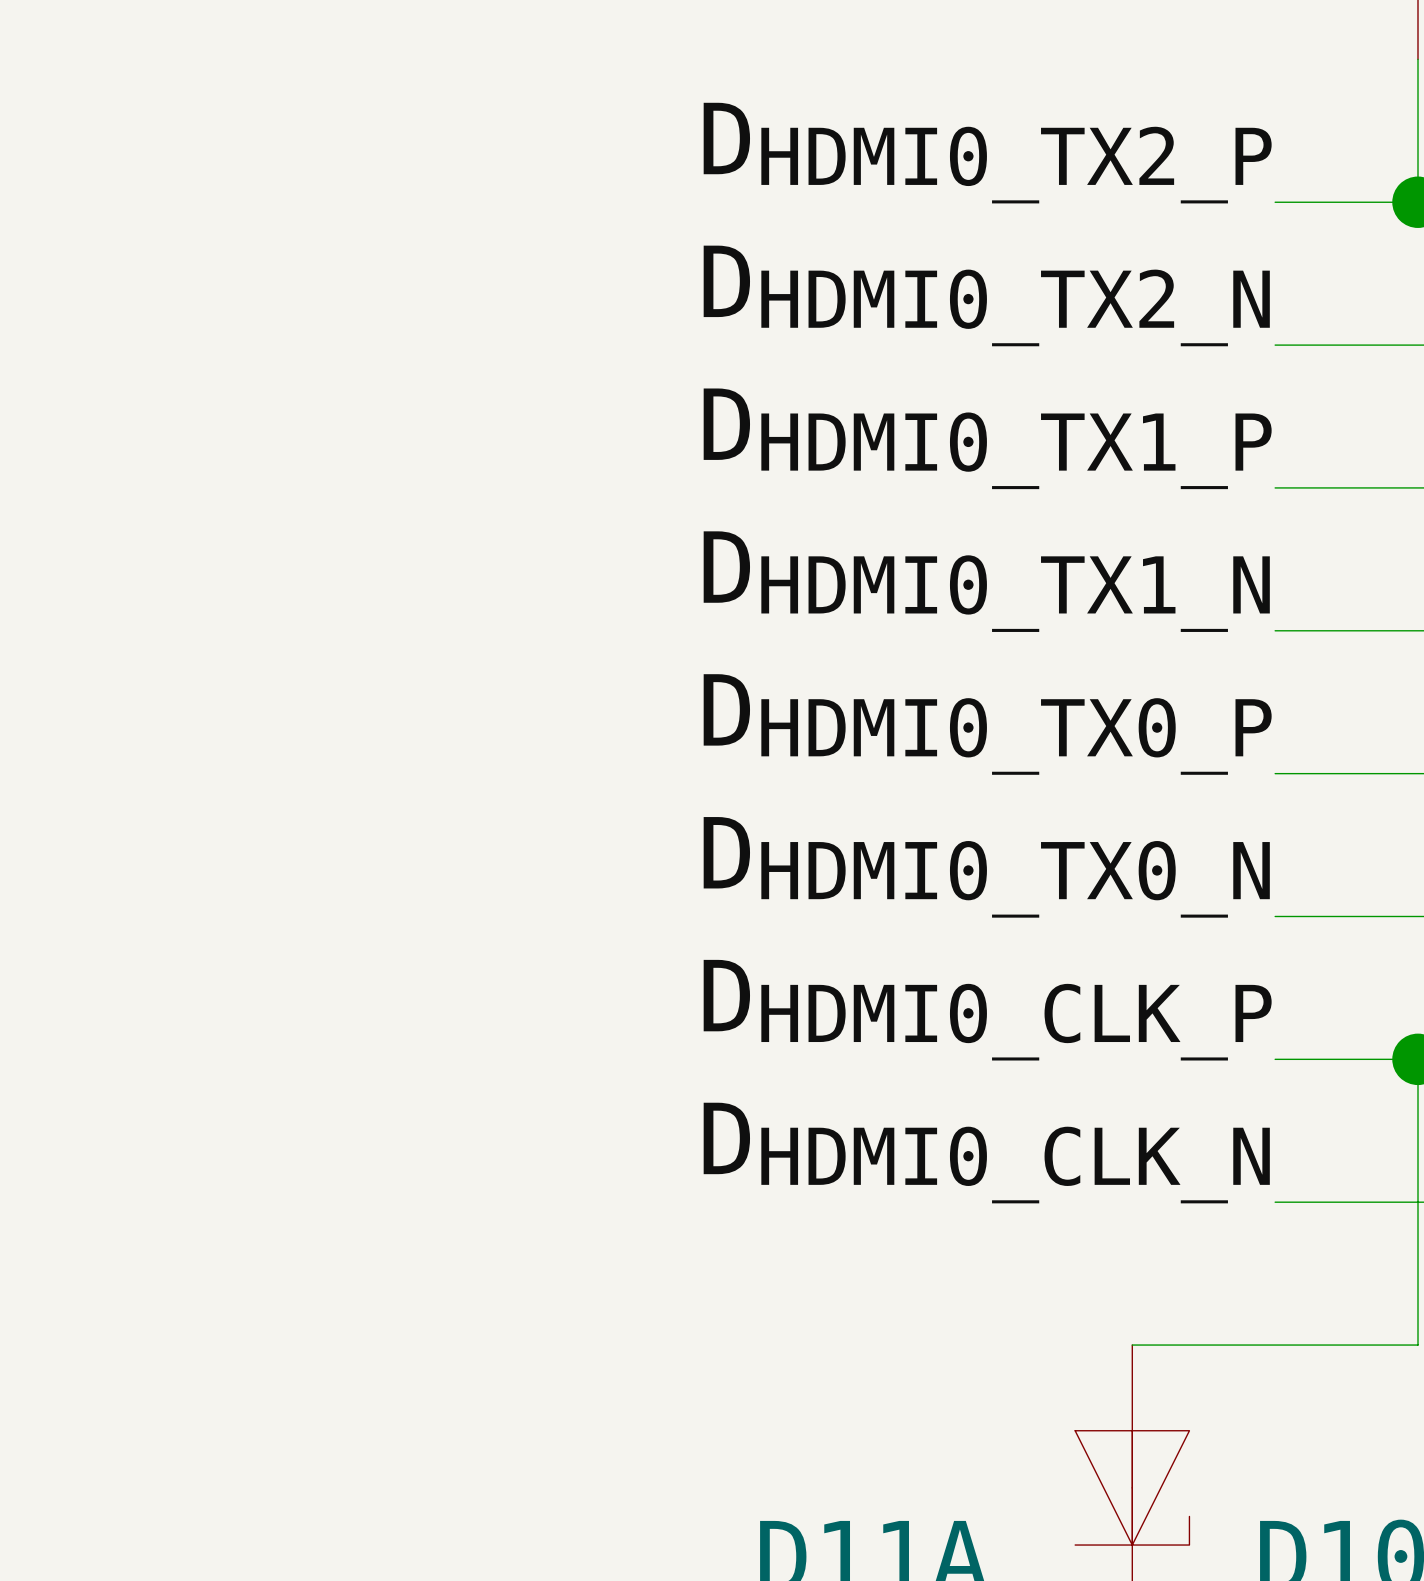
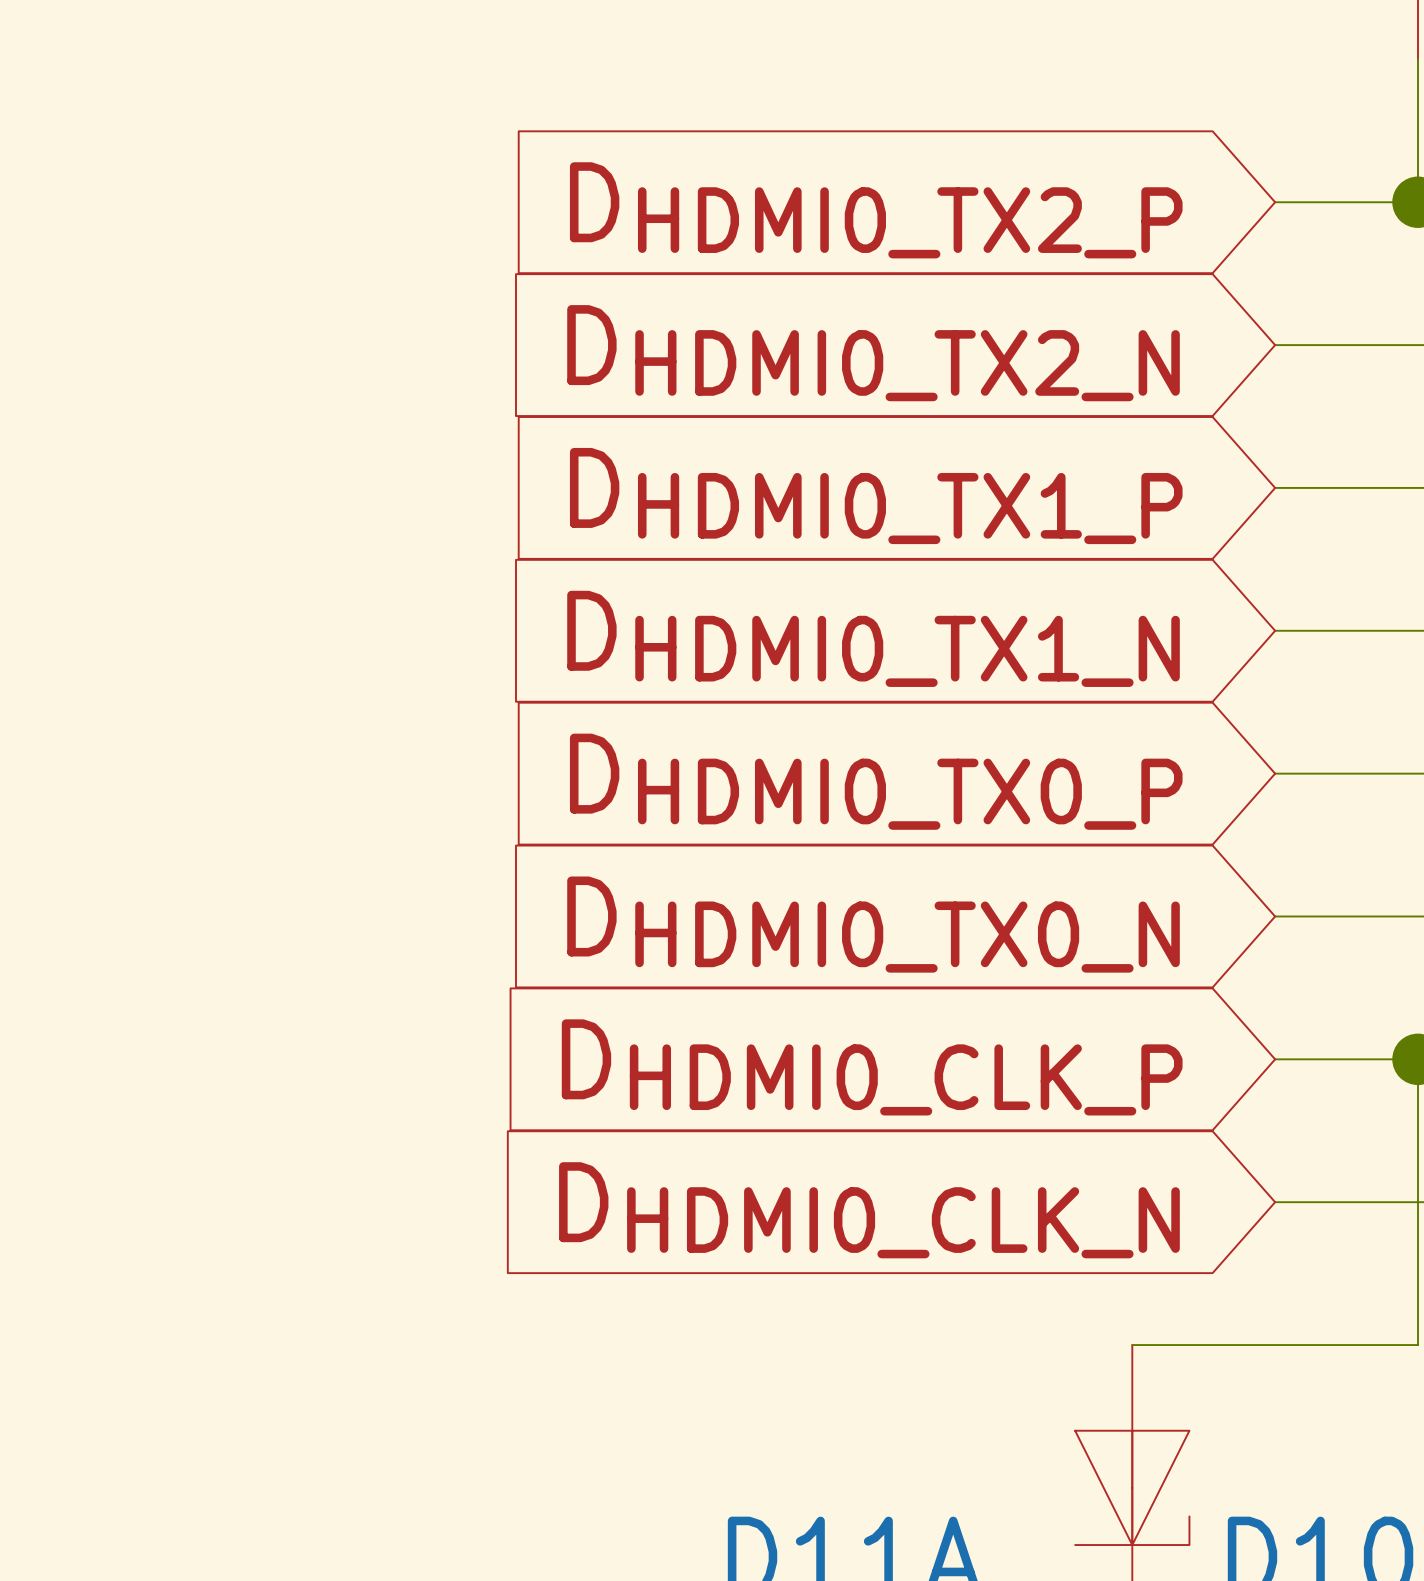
label: DHDMI0_TX2_P (987, 153) -> none
global label: none -> DHDMI0_TX2_P (876, 210)
label: DHDMI0_TX2_N (986, 295) -> none
global label: none -> DHDMI0_TX2_N (873, 353)
label: DHDMI0_TX1_P (987, 438) -> none
global label: none -> DHDMI0_TX1_P (876, 496)
label: DHDMI0_TX1_N (986, 581) -> none
global label: none -> DHDMI0_TX1_N (873, 638)
label: DHDMI0_TX0_P (987, 724) -> none
global label: none -> DHDMI0_TX0_P (876, 781)
label: DHDMI0_TX0_N (986, 867) -> none
global label: none -> DHDMI0_TX0_N (873, 924)
label: DHDMI0_CLK_P (987, 1010) -> none
global label: none -> DHDMI0_CLK_P (872, 1067)
label: DHDMI0_CLK_N (986, 1153) -> none
global label: none -> DHDMI0_CLK_N (869, 1210)

